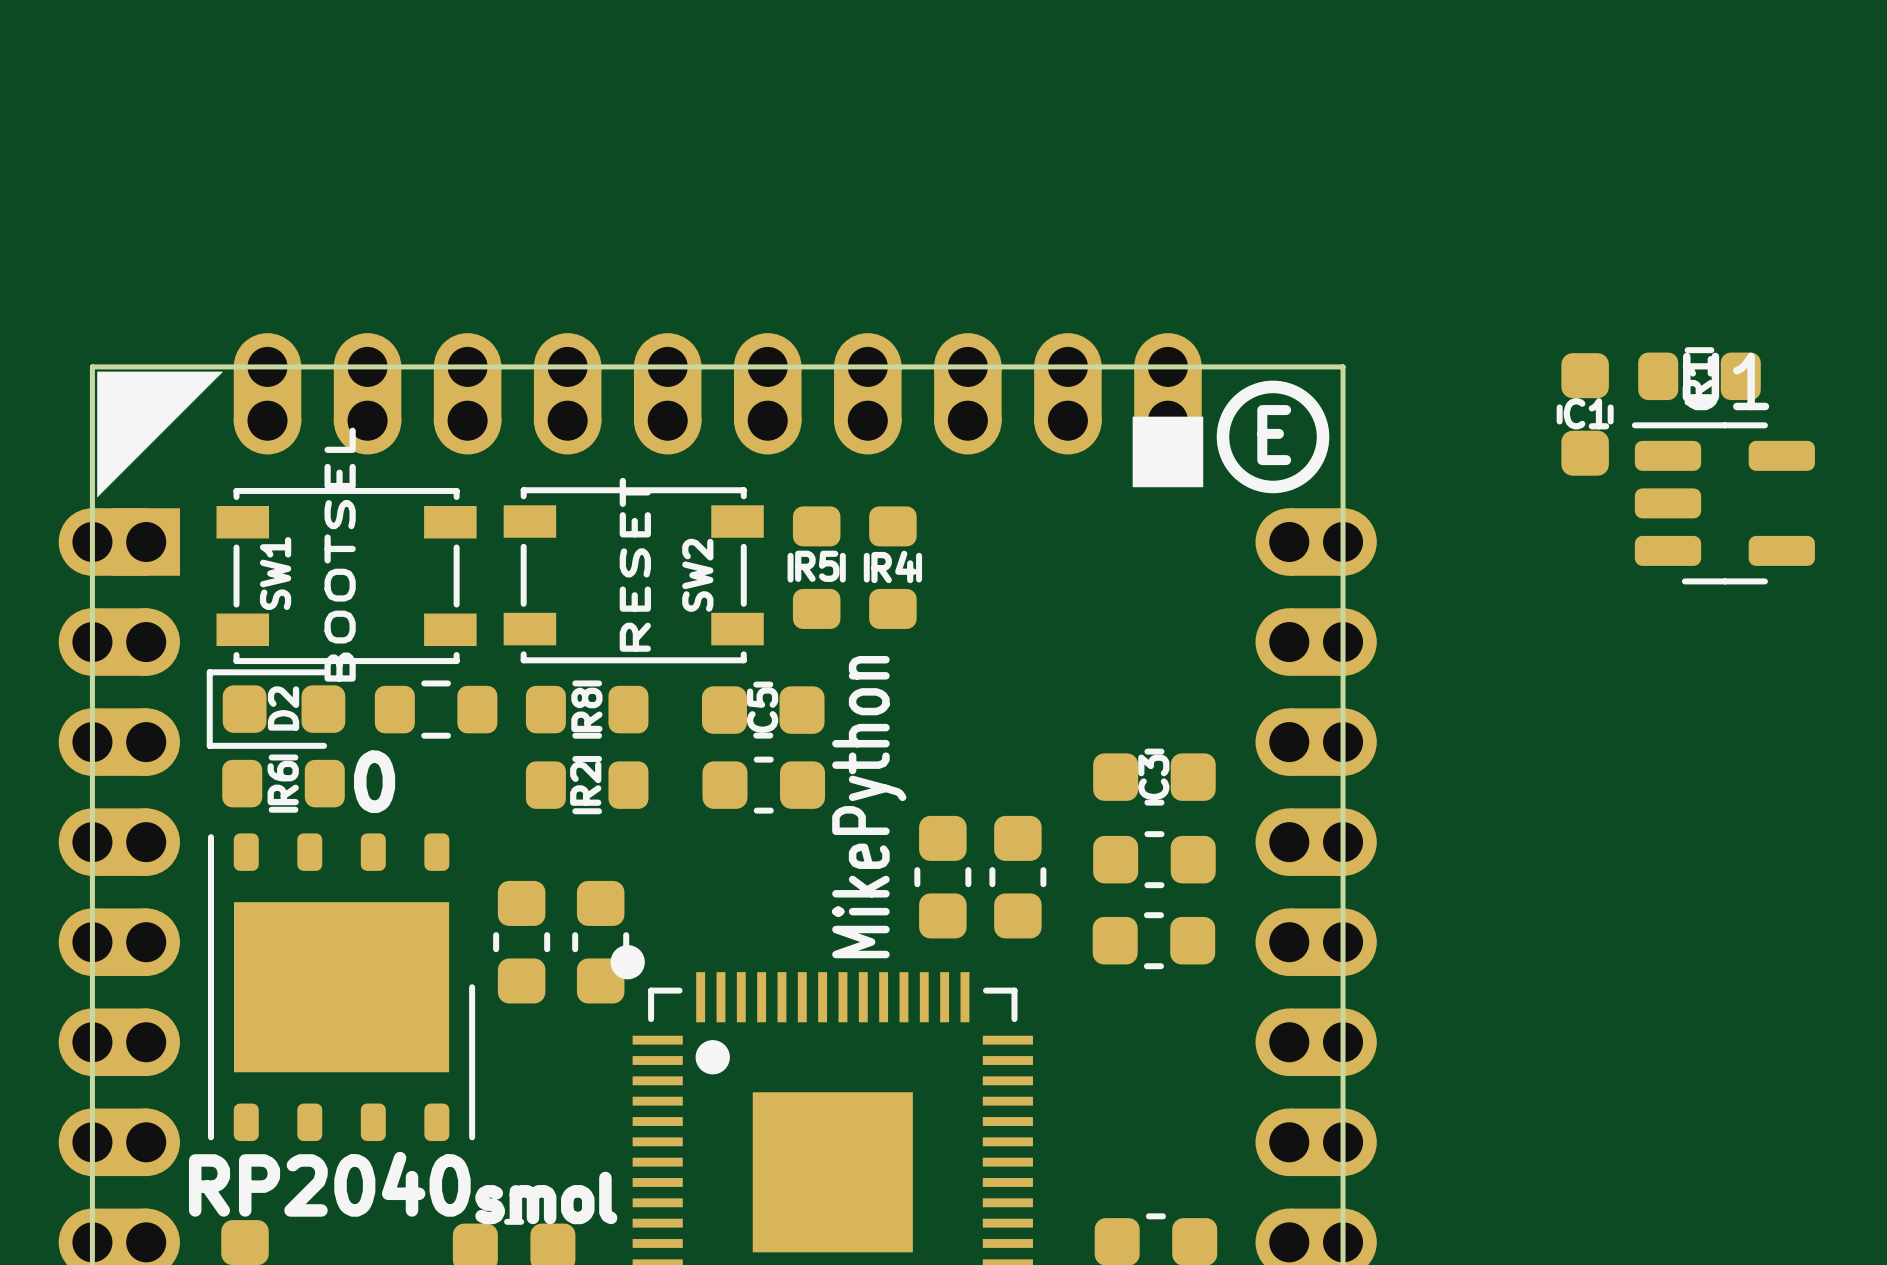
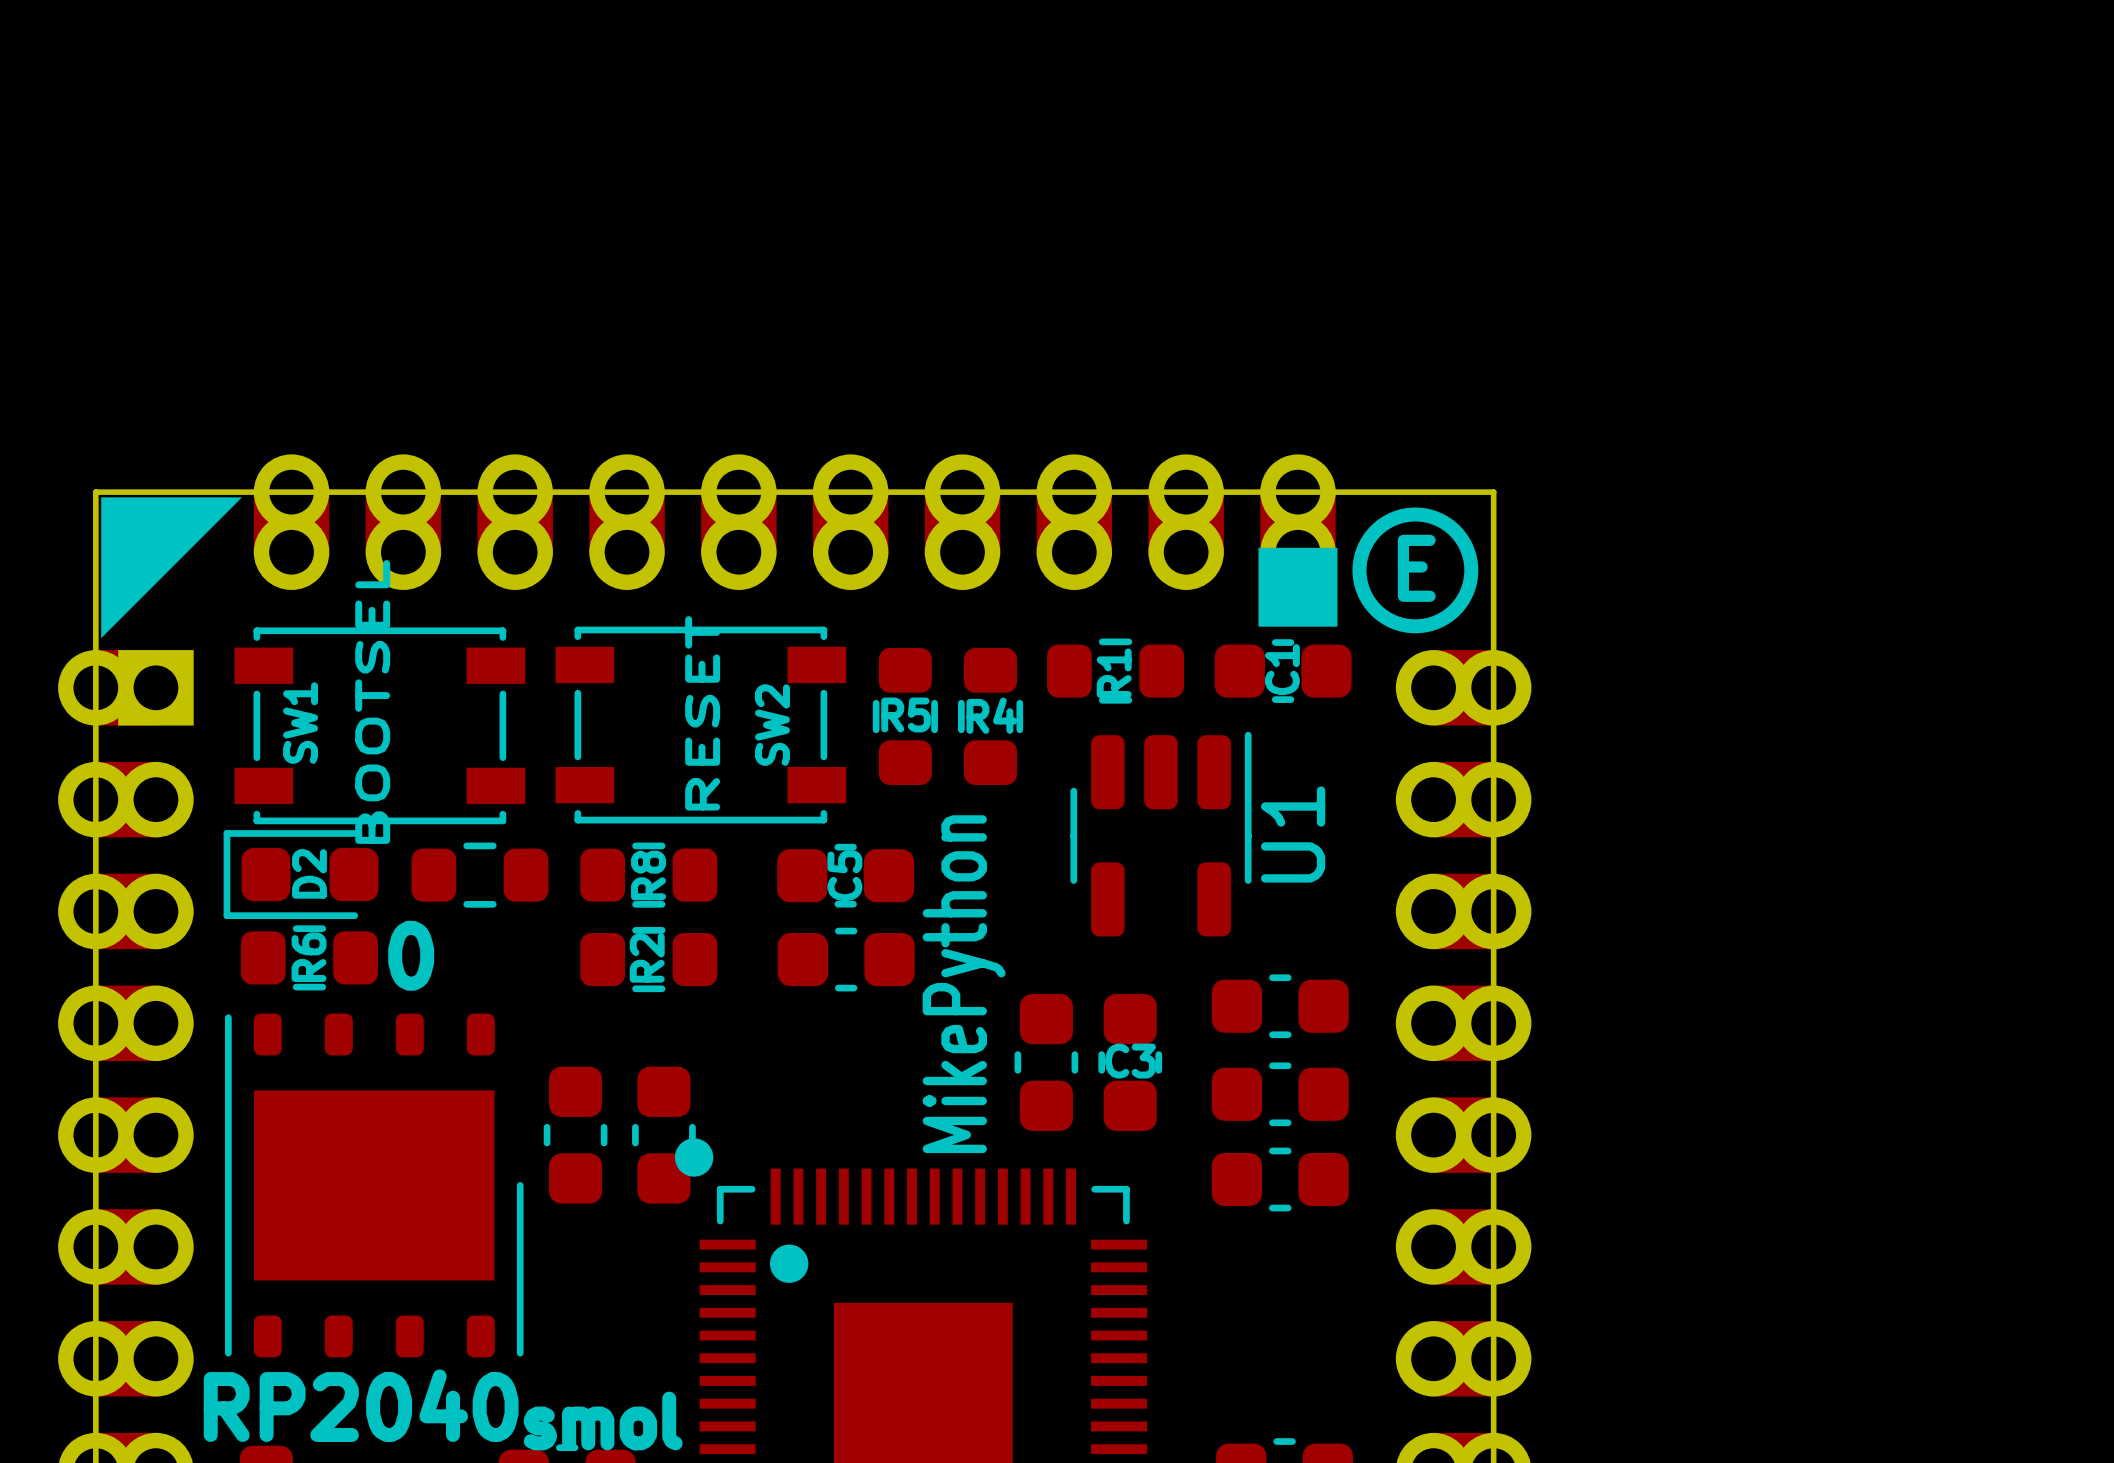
R1 position: (1699, 376) -> (1115, 671)
C1 rotation: 0° (1585, 414) -> 90° clockwise (1283, 671)
C1 position: (1585, 414) -> (1283, 671)
U1 rotation: 0° (1723, 503) -> 90° clockwise (1160, 834)
U1 position: (1723, 503) -> (1160, 834)
C3: (1154, 777) -> none
part: none -> (1280, 1006)
part: (1154, 859) -> none
C3 name: none -> C3 (1130, 1061)
part: none -> (1280, 1094)
part: (1153, 940) -> none
part: none -> (1280, 1179)

